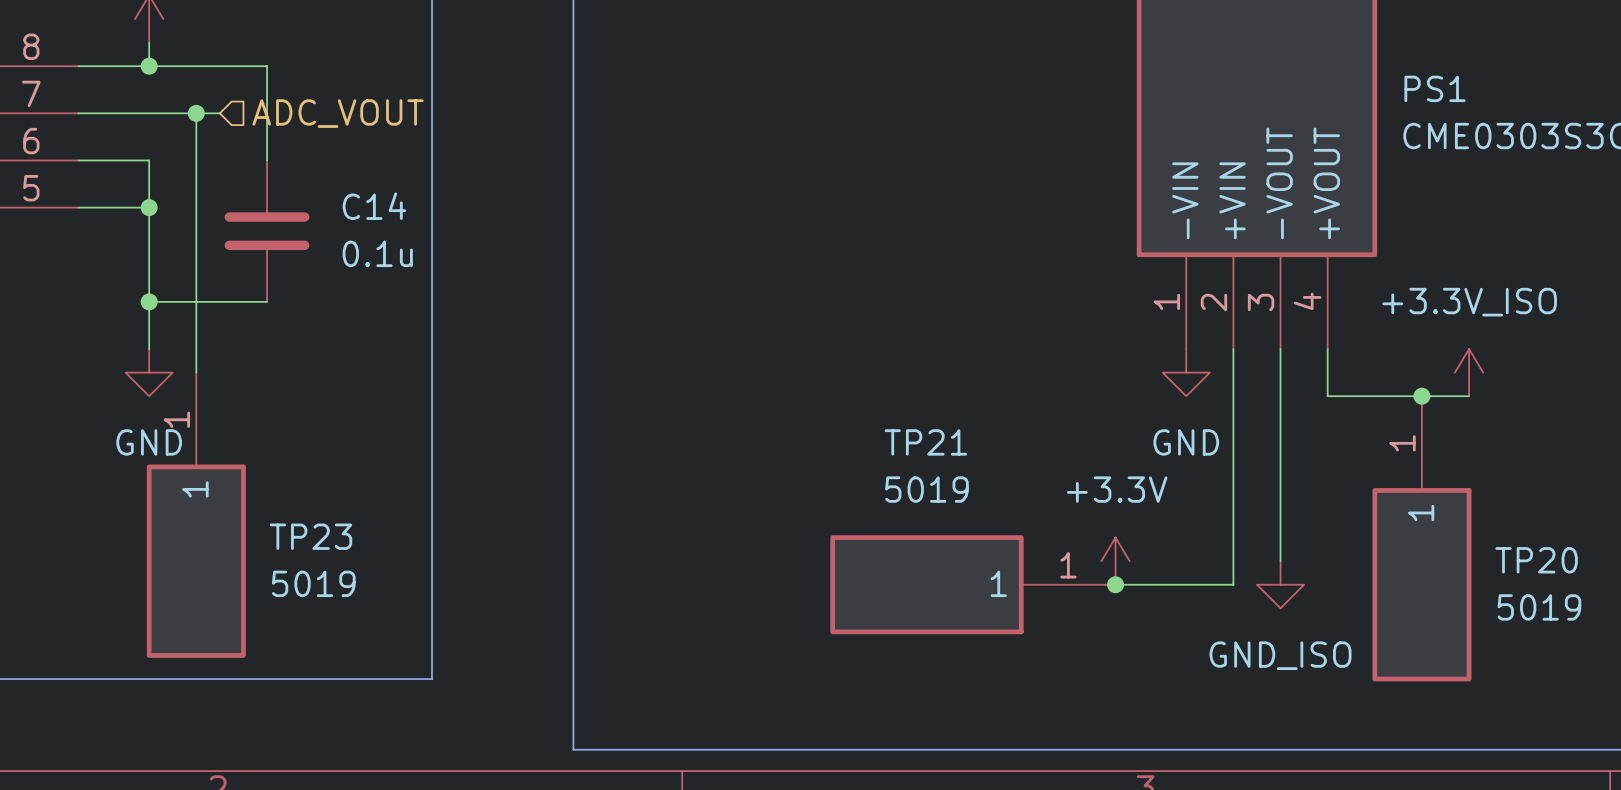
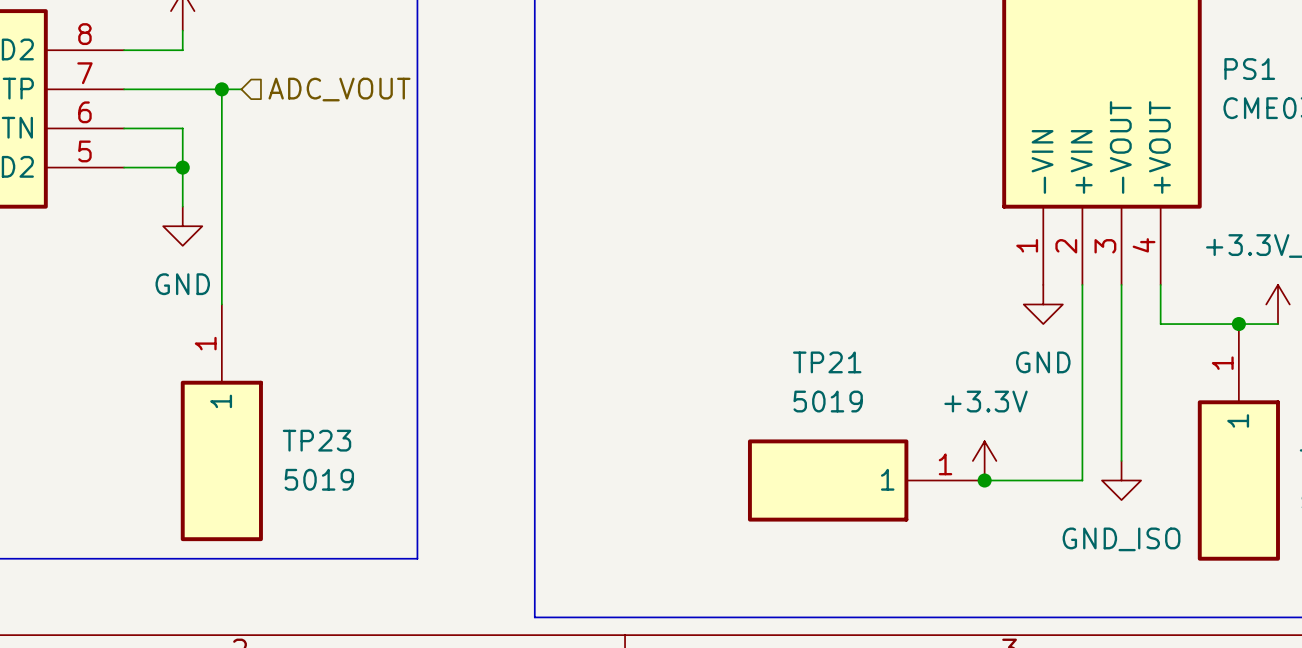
wire: (149, 66) (267, 66) (267, 160) -> none
junction: (149, 66) -> none
C14: 0.1u (267, 231) -> none
wire: (149, 254) (149, 349) -> none
wire: (149, 301) (267, 301) -> none
junction: (149, 301) -> none
power symbol position: GND (149, 372) -> GND (182, 226)

